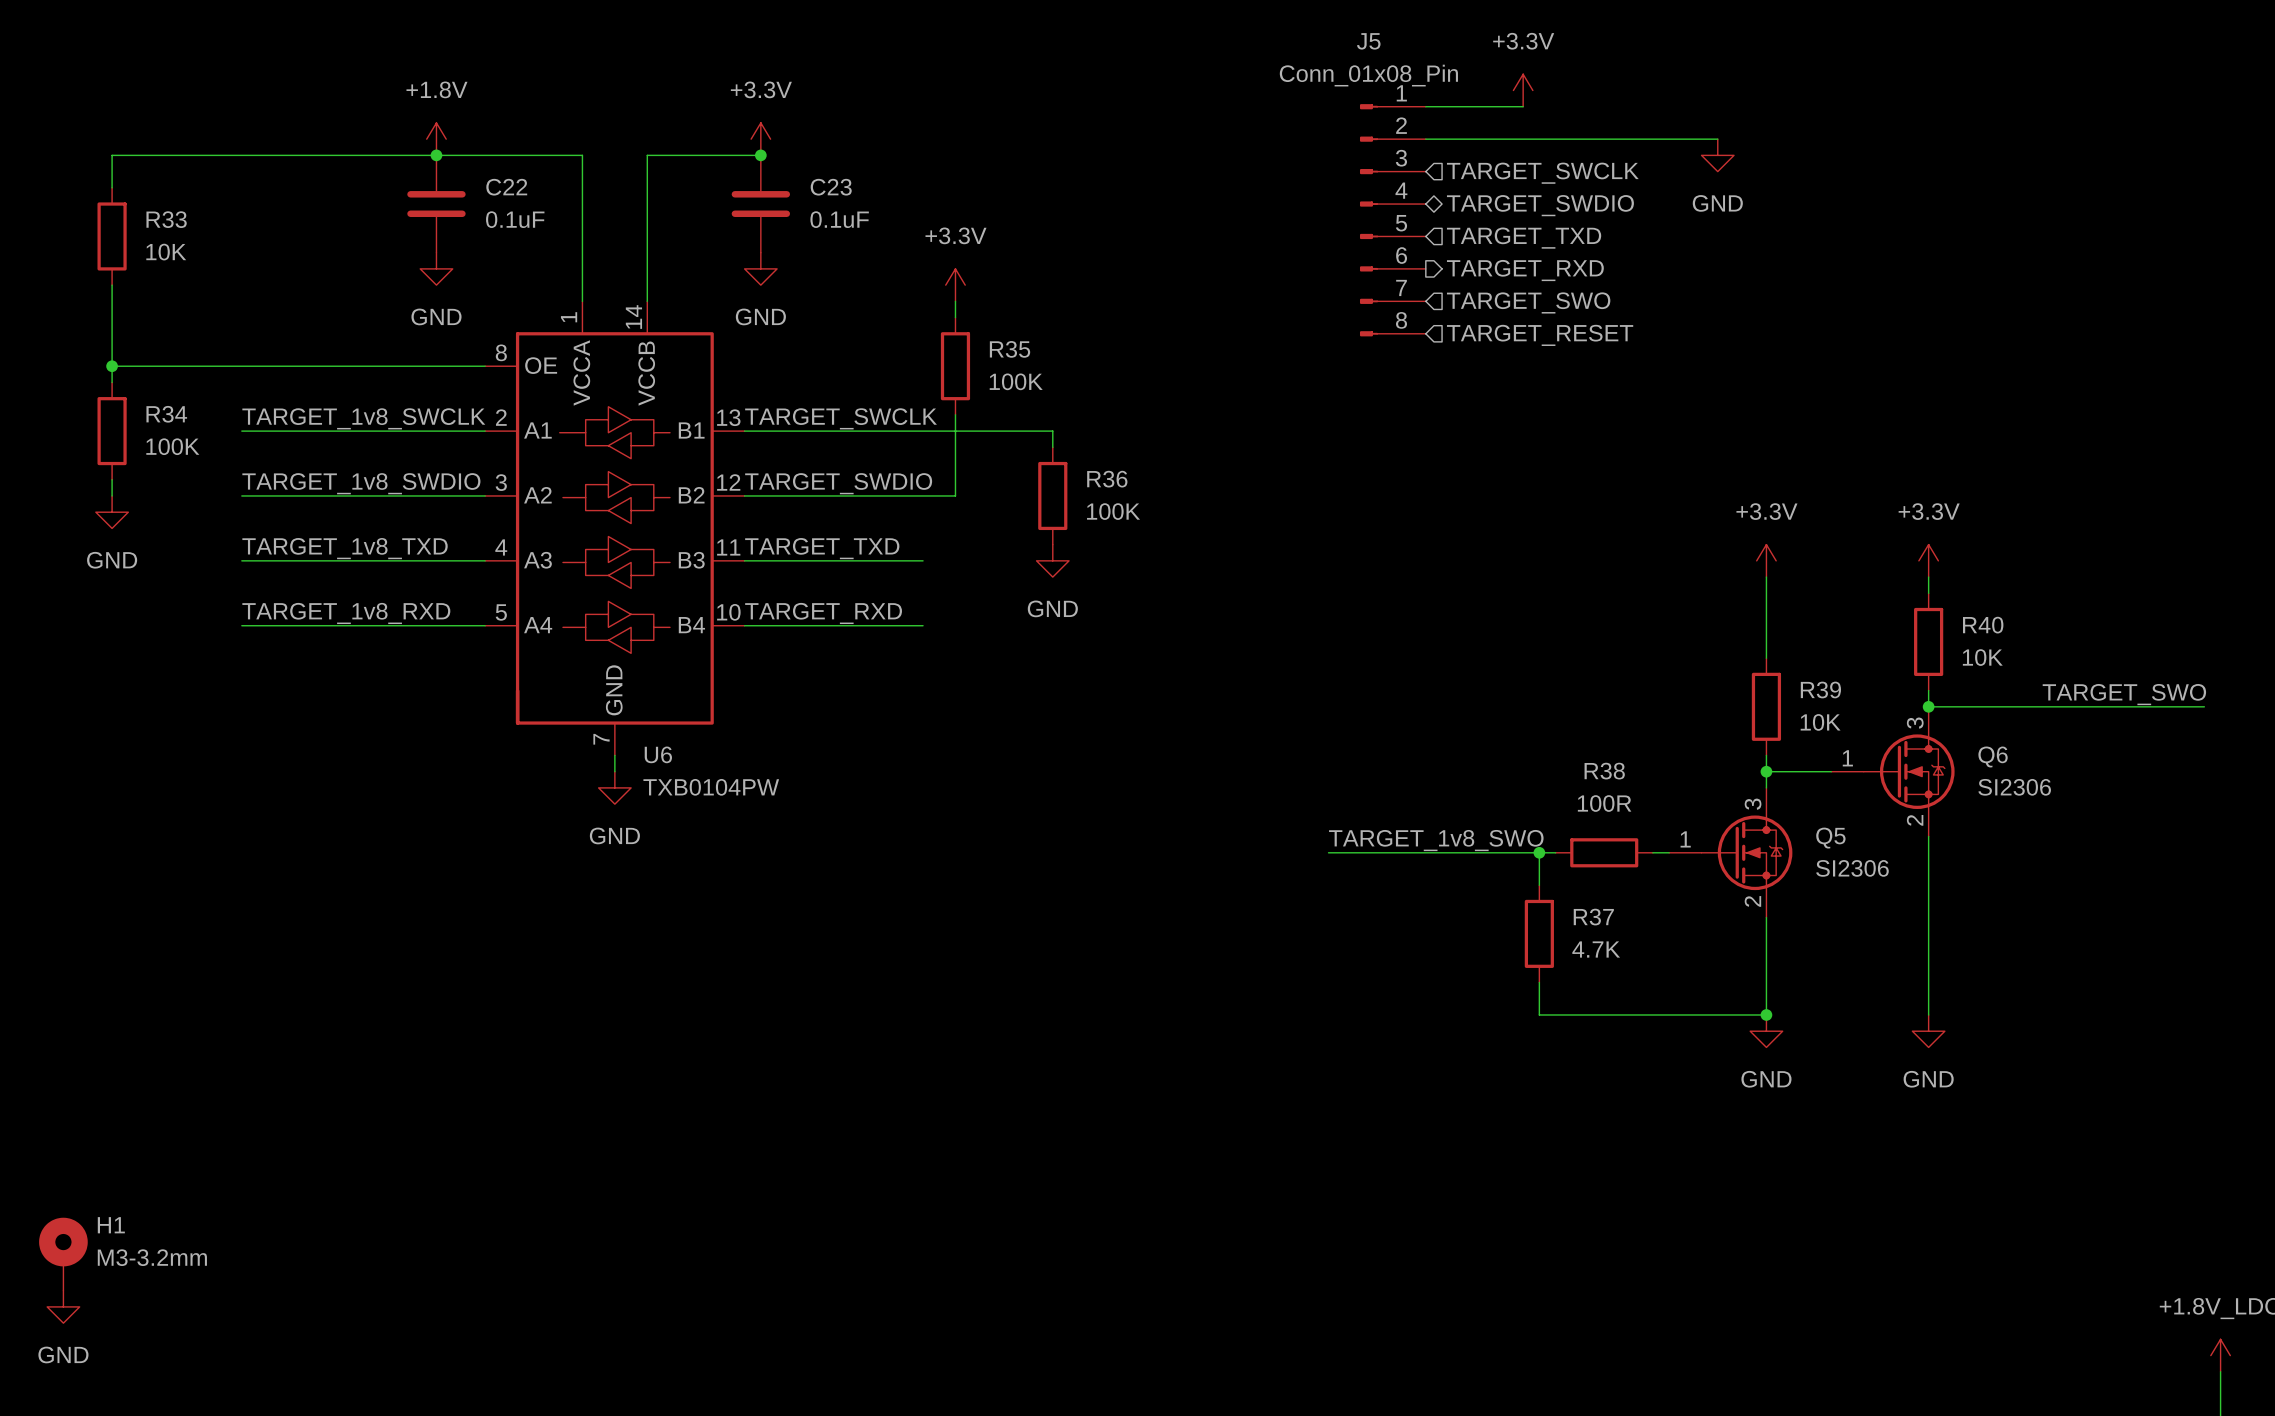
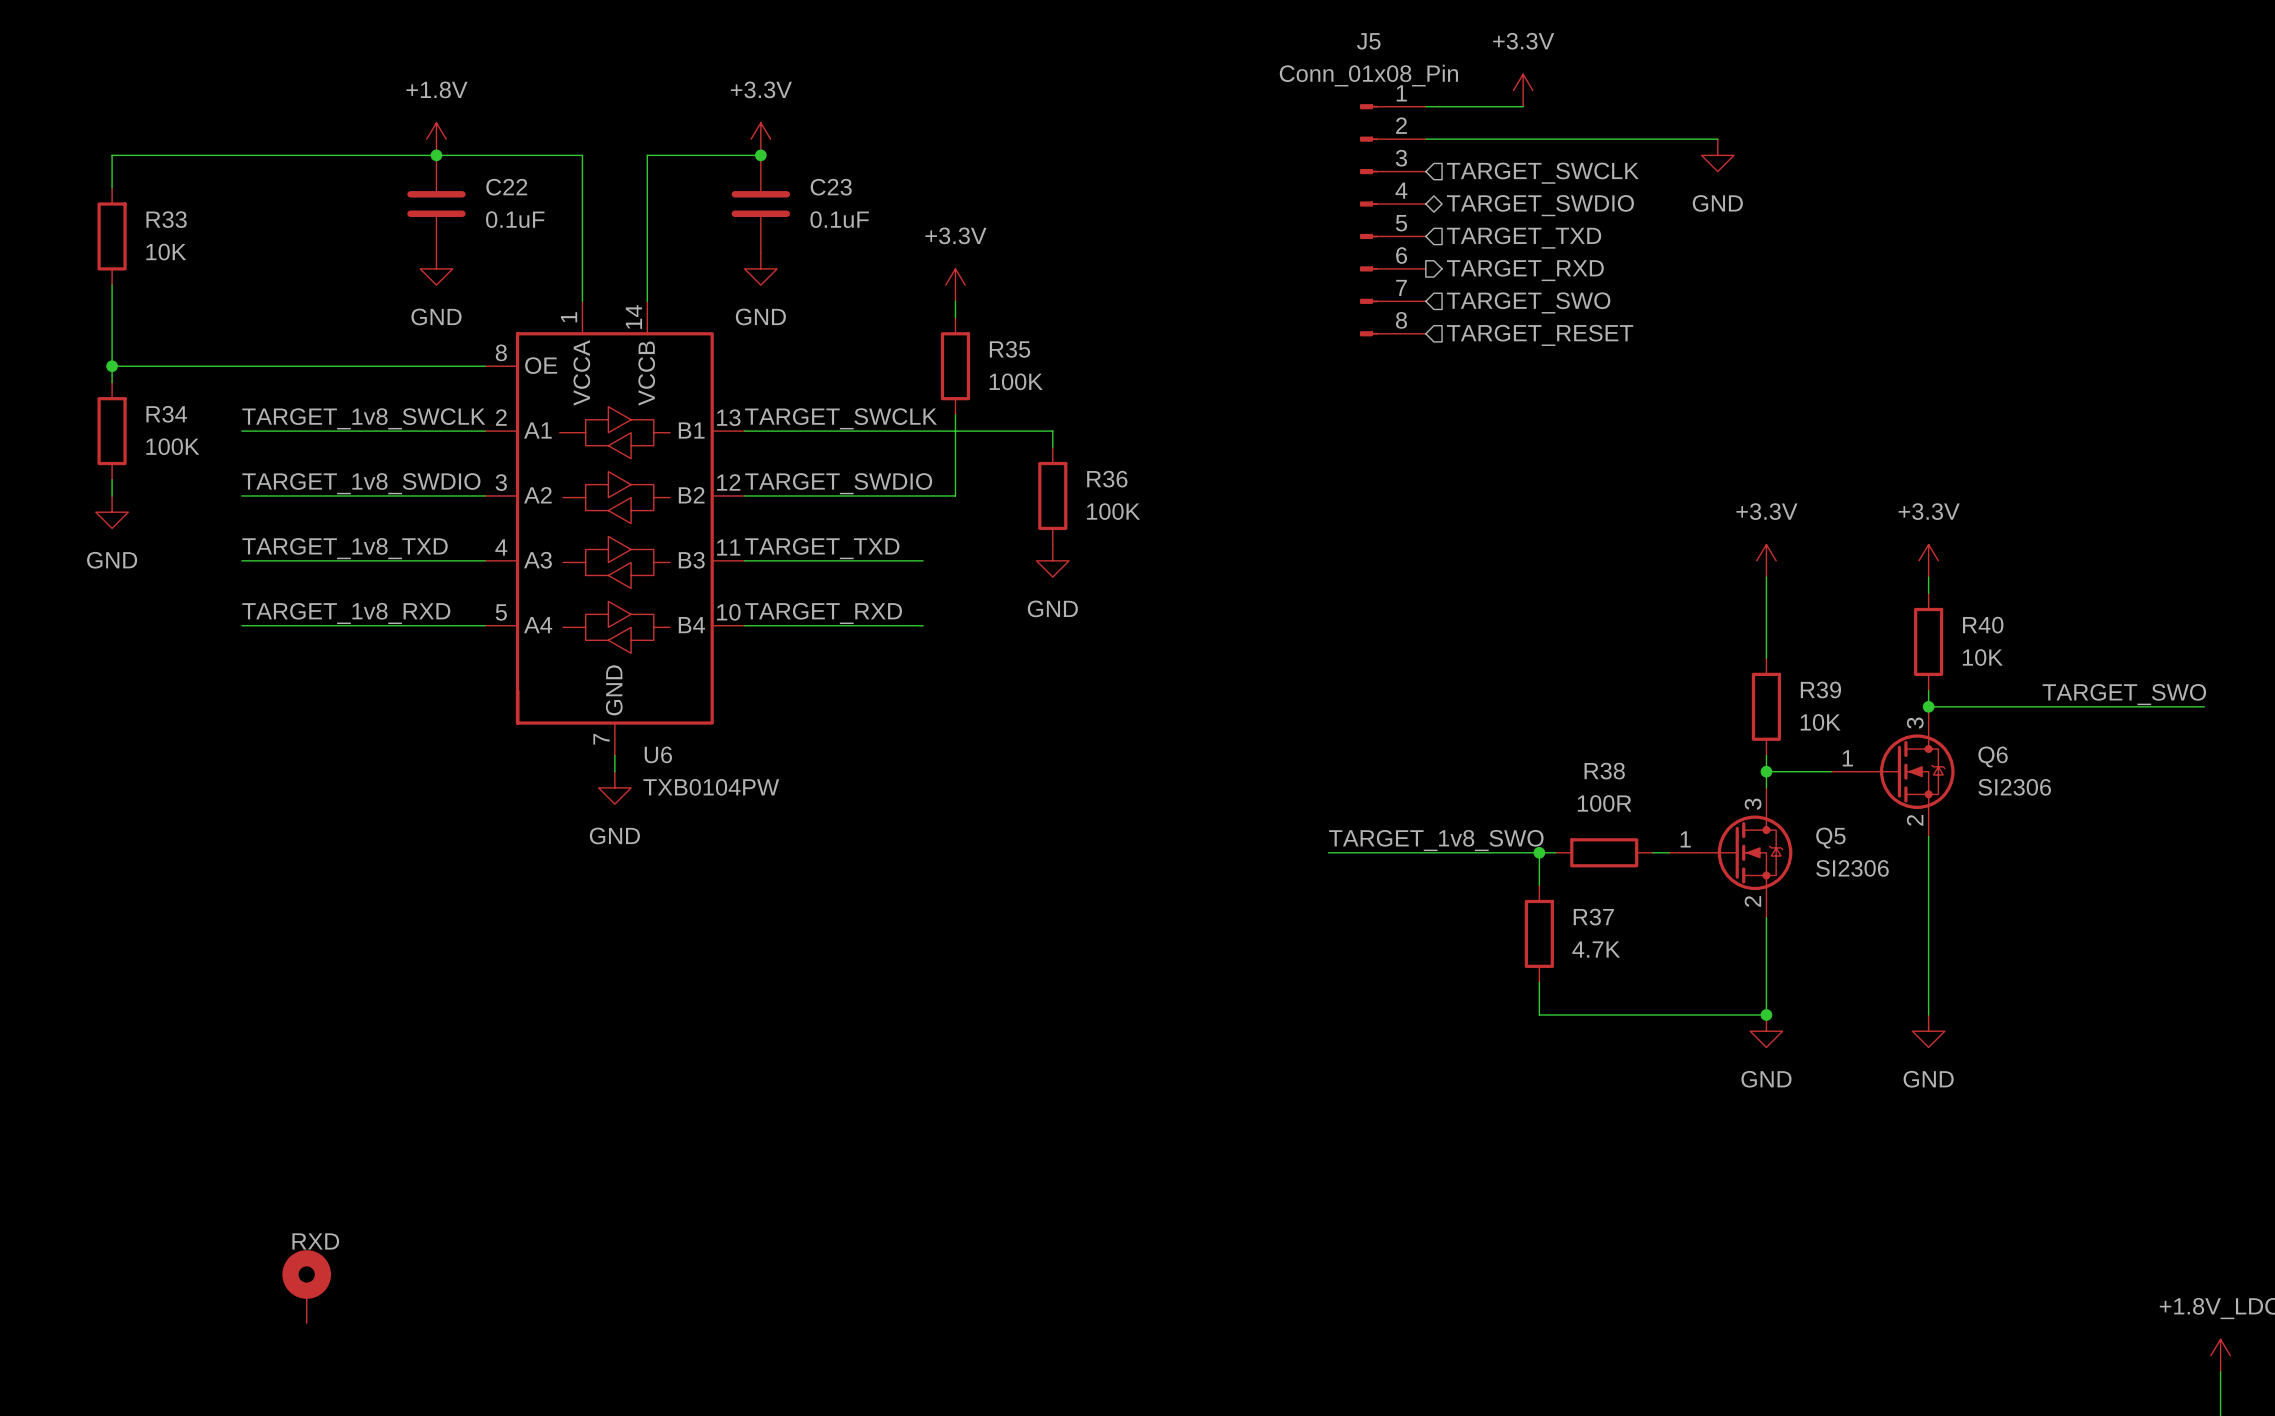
H1: M3-3.2mm (63, 1254) -> none
part: none -> RXD (306, 1286)
power symbol: GND (63, 1306) -> none

